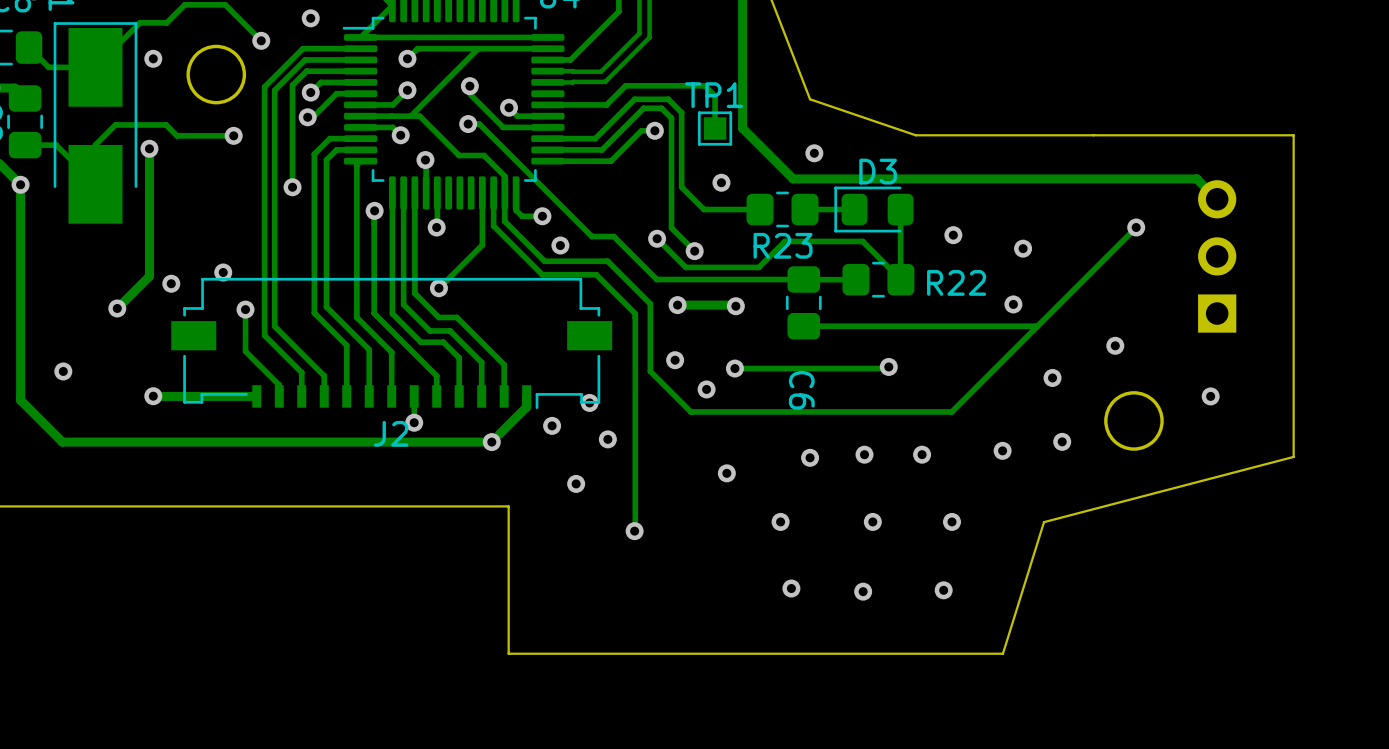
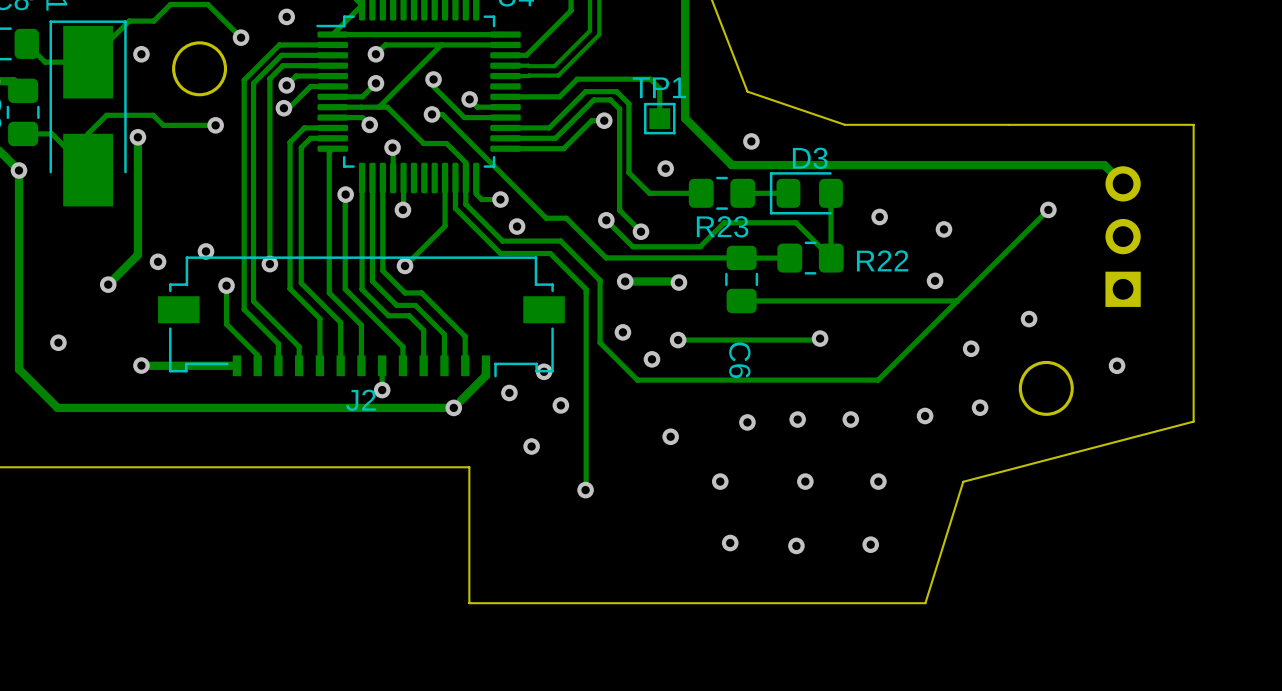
track: none -> (269, 172) (269, 264)
via position: (292, 187) -> (269, 264)

